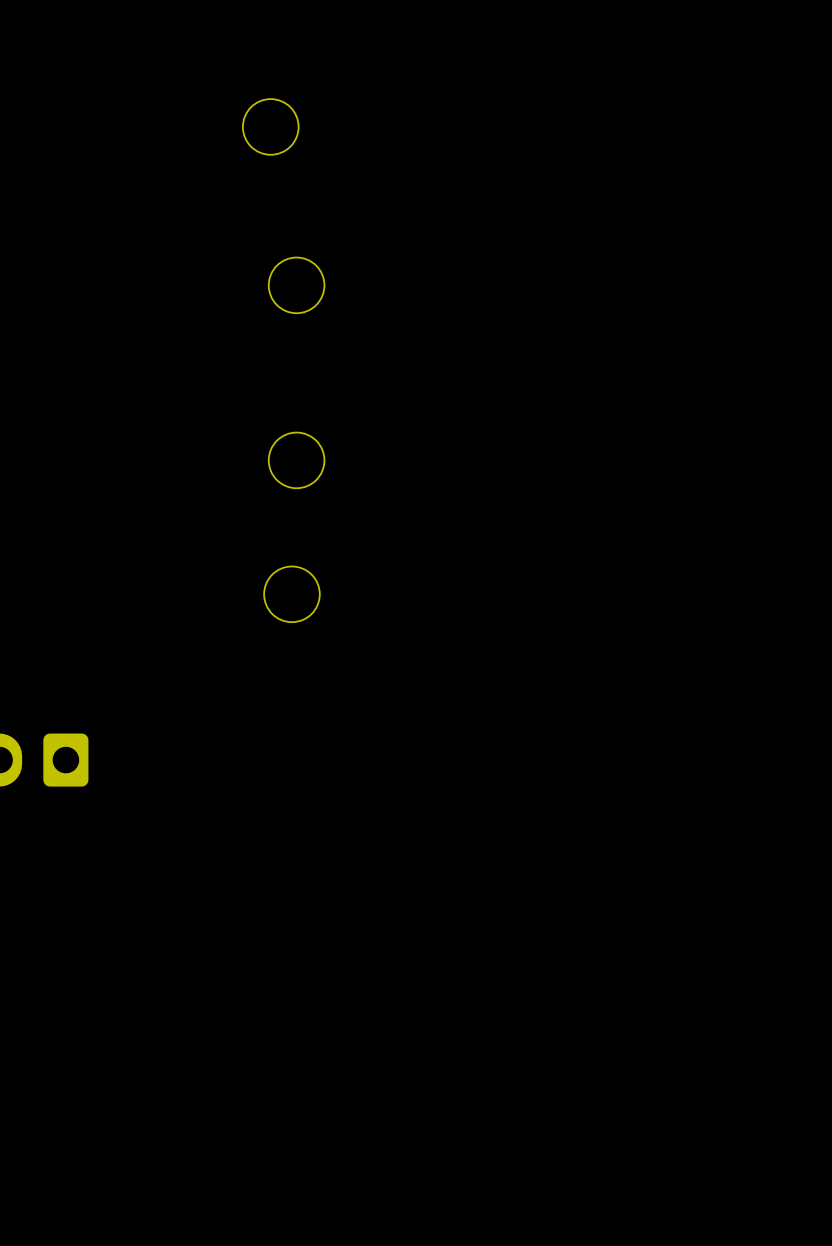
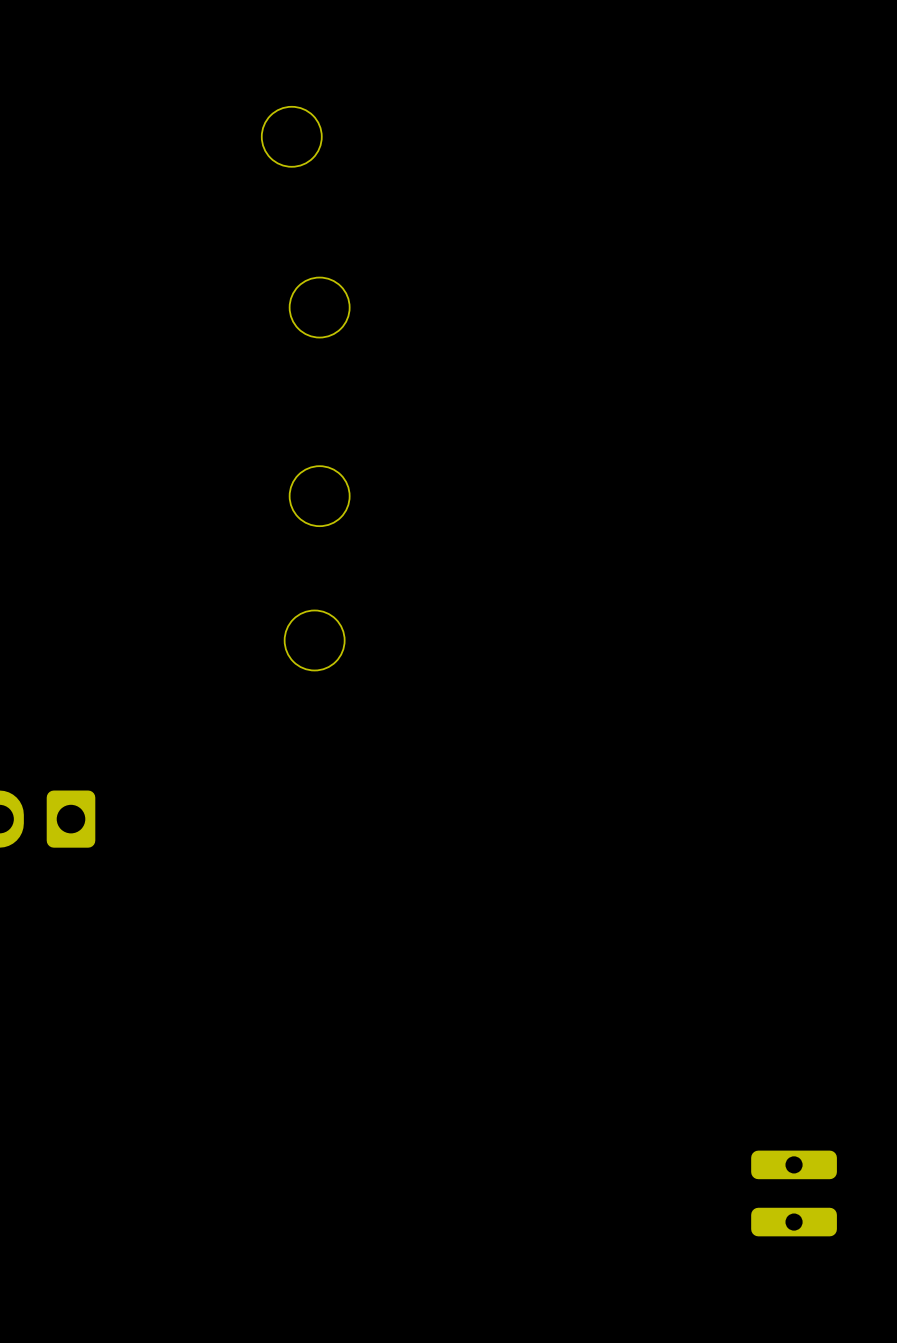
part: none -> (794, 1164)
part: none -> (794, 1222)

